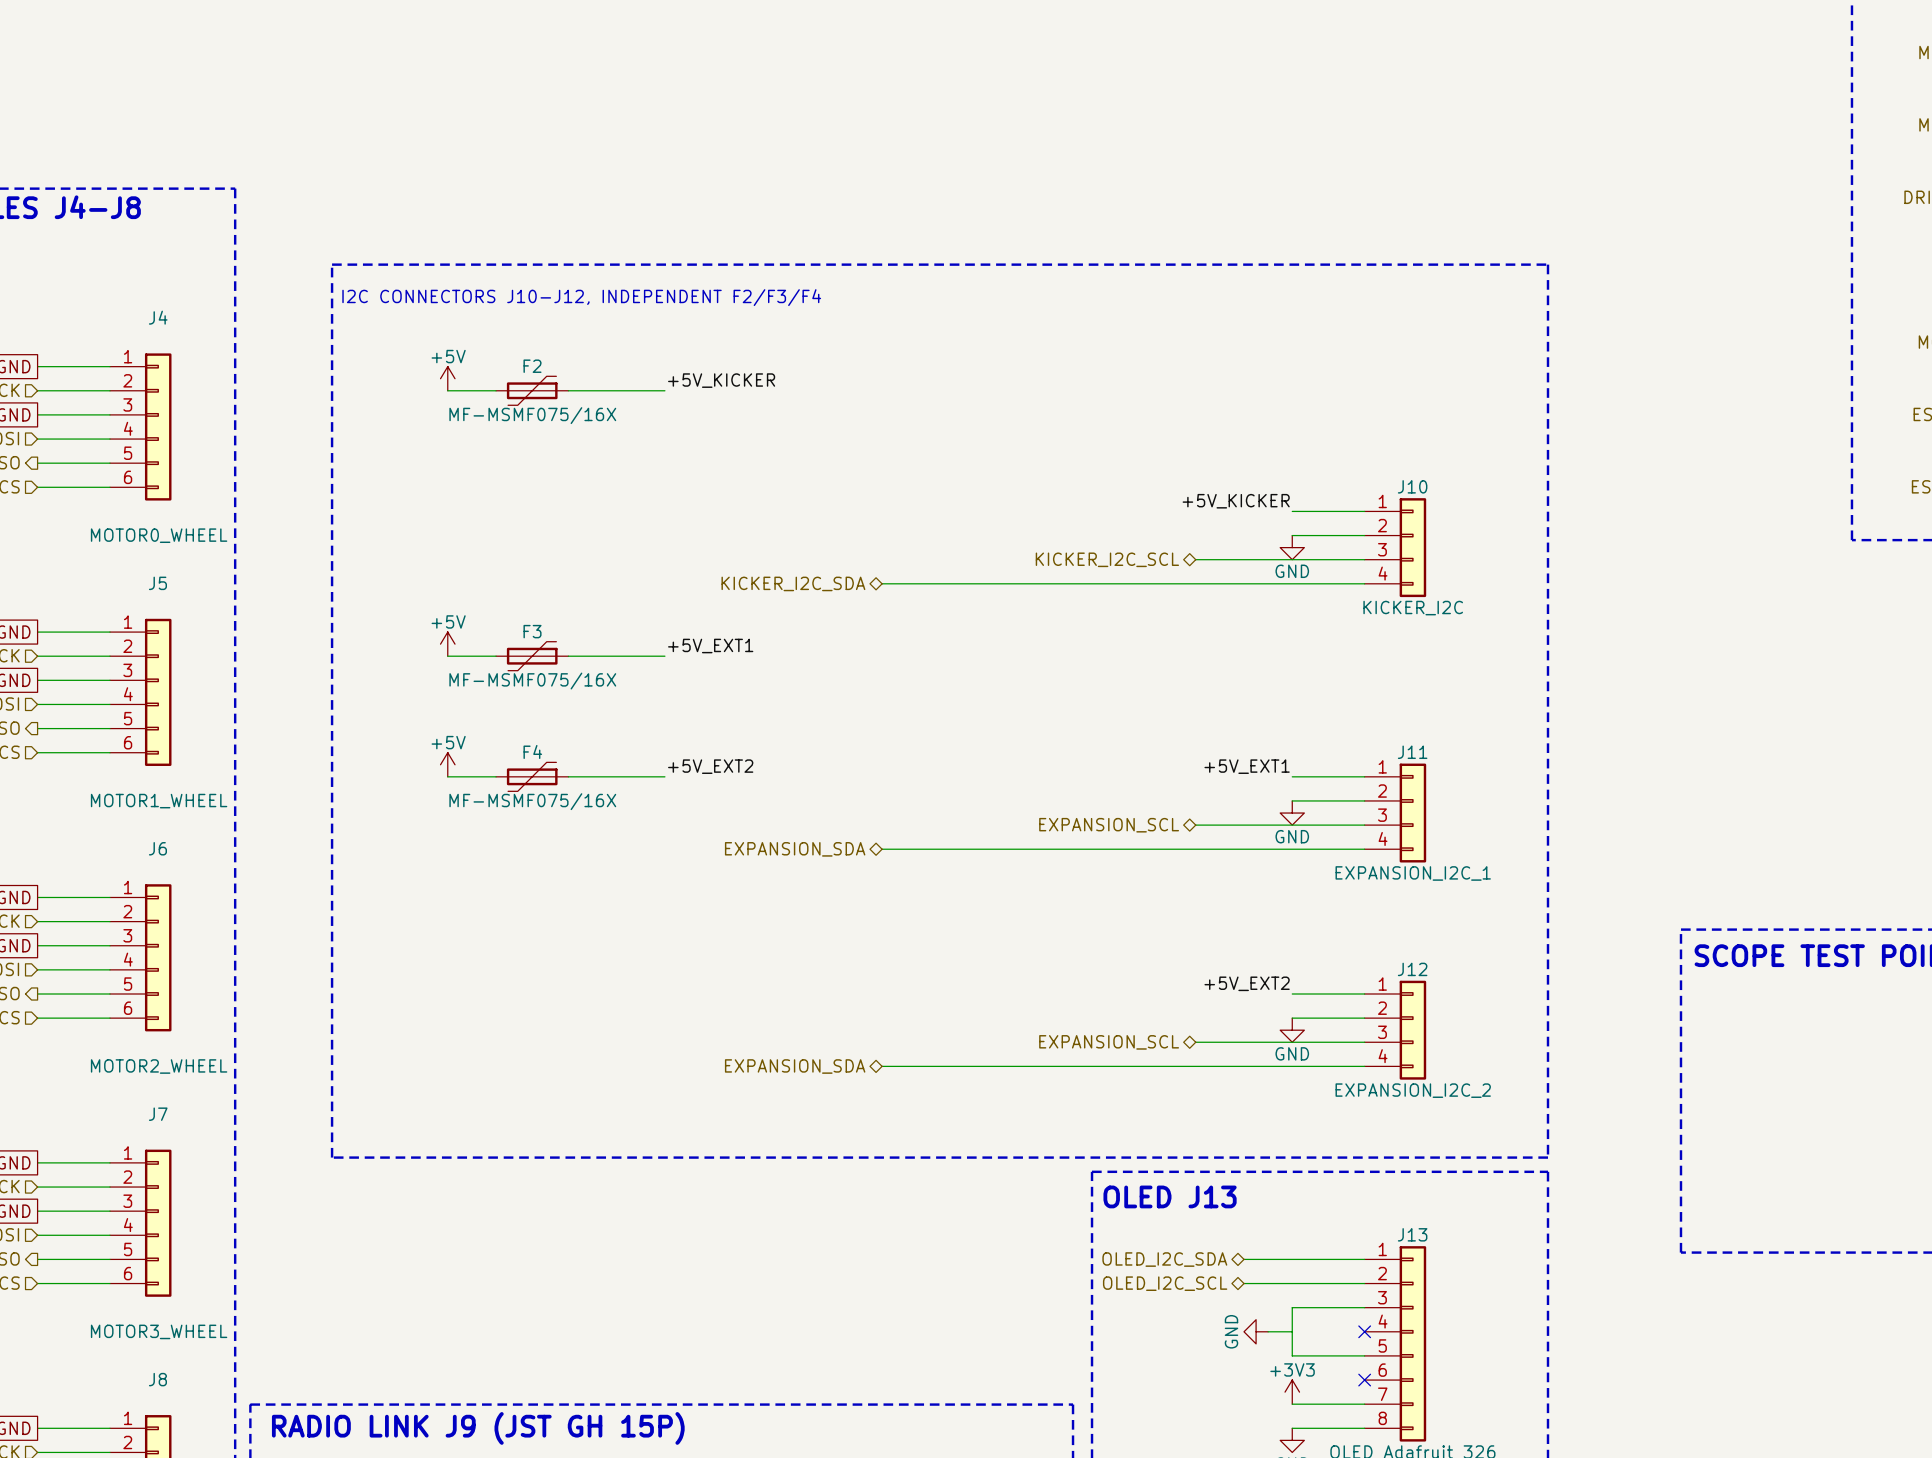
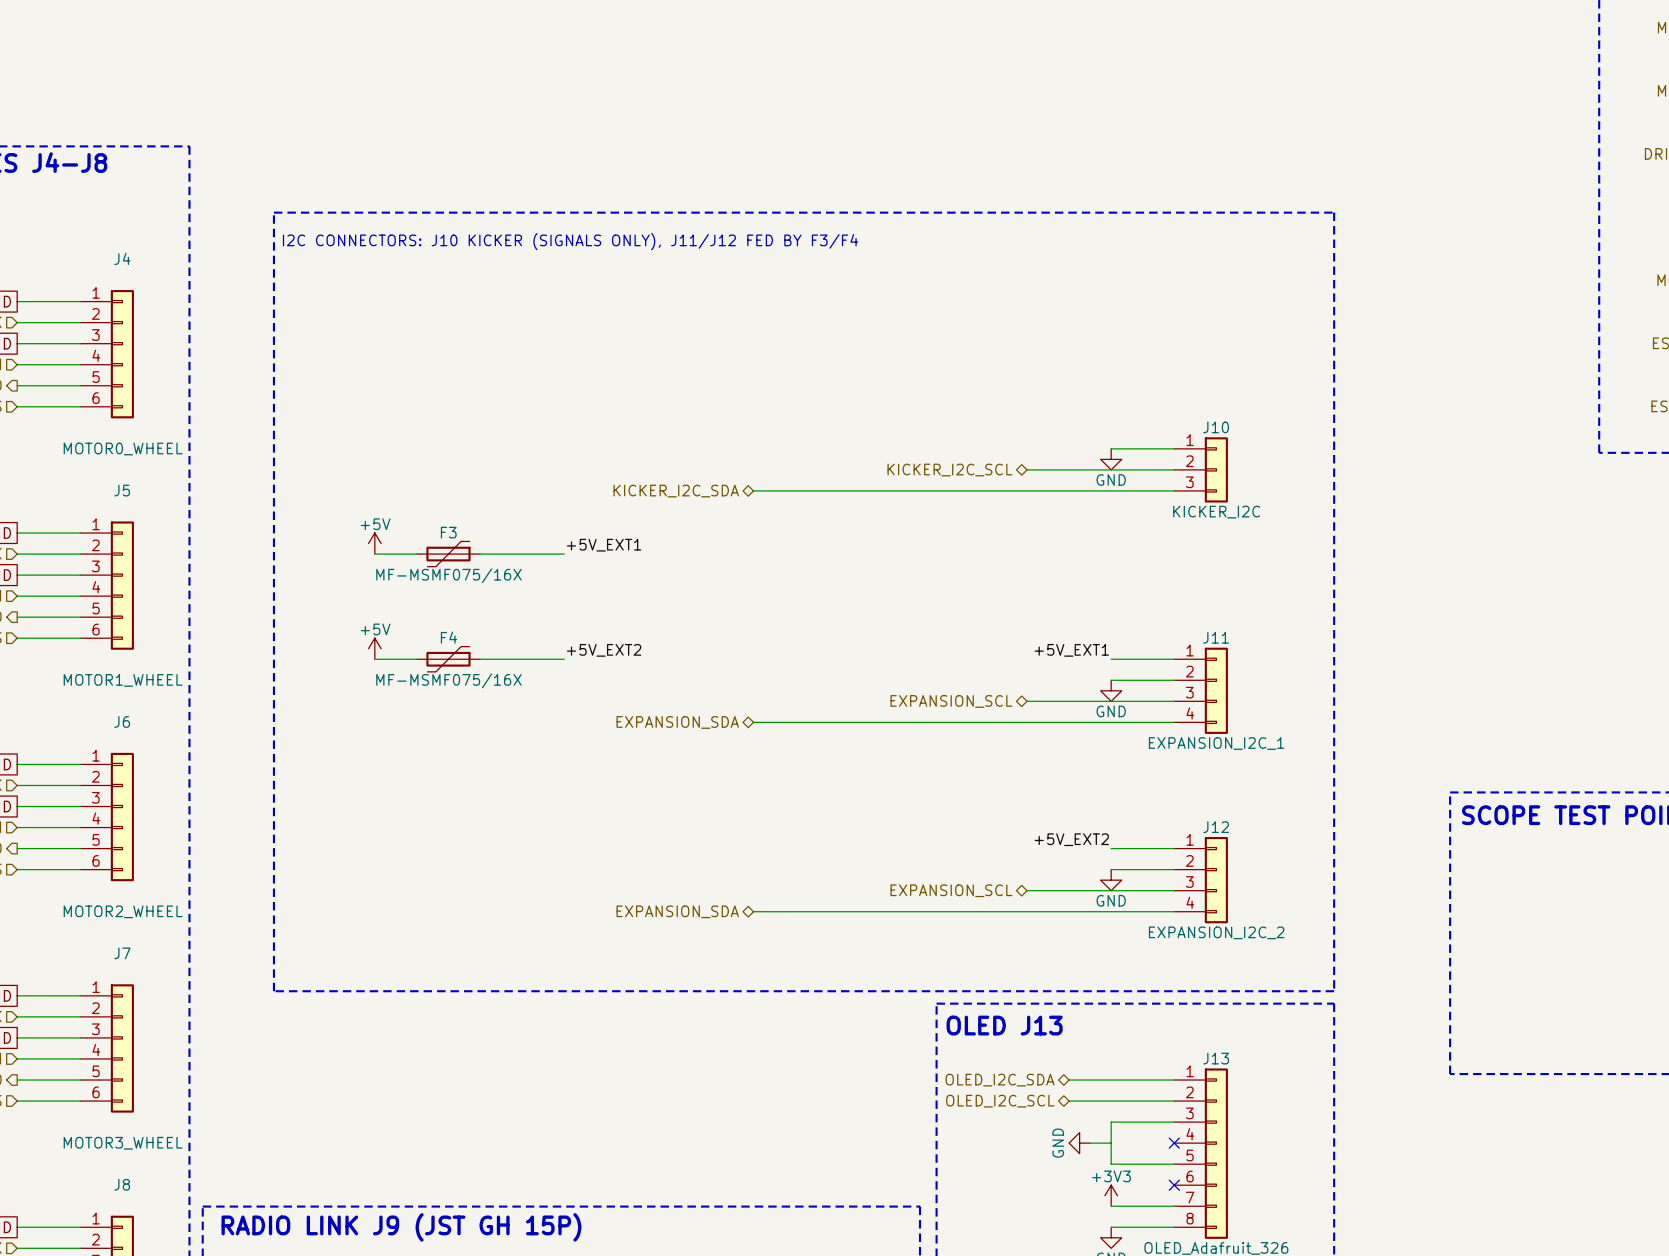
text: I2C CONNECTORS J10-J12, INDEPENDENT F2/F3/F4 (581, 297) -> I2C CONNECTORS: J10 KICKER (SIGNALS ONLY), J11/J12 FED BY F3/F4 (570, 241)
power symbol: +5V (447, 378) -> none
label: +5V_KICKER (721, 380) -> none
wire: (447, 390) (496, 390) -> none
F2: MF-MSMF075/16X (532, 390) -> none
wire: (568, 390) (664, 390) -> none
J10 symbol: [1364, 498, 1427, 598] -> [1174, 437, 1228, 503]
label: +5V_KICKER (1236, 501) -> none
wire: (1292, 511) (1364, 511) -> none

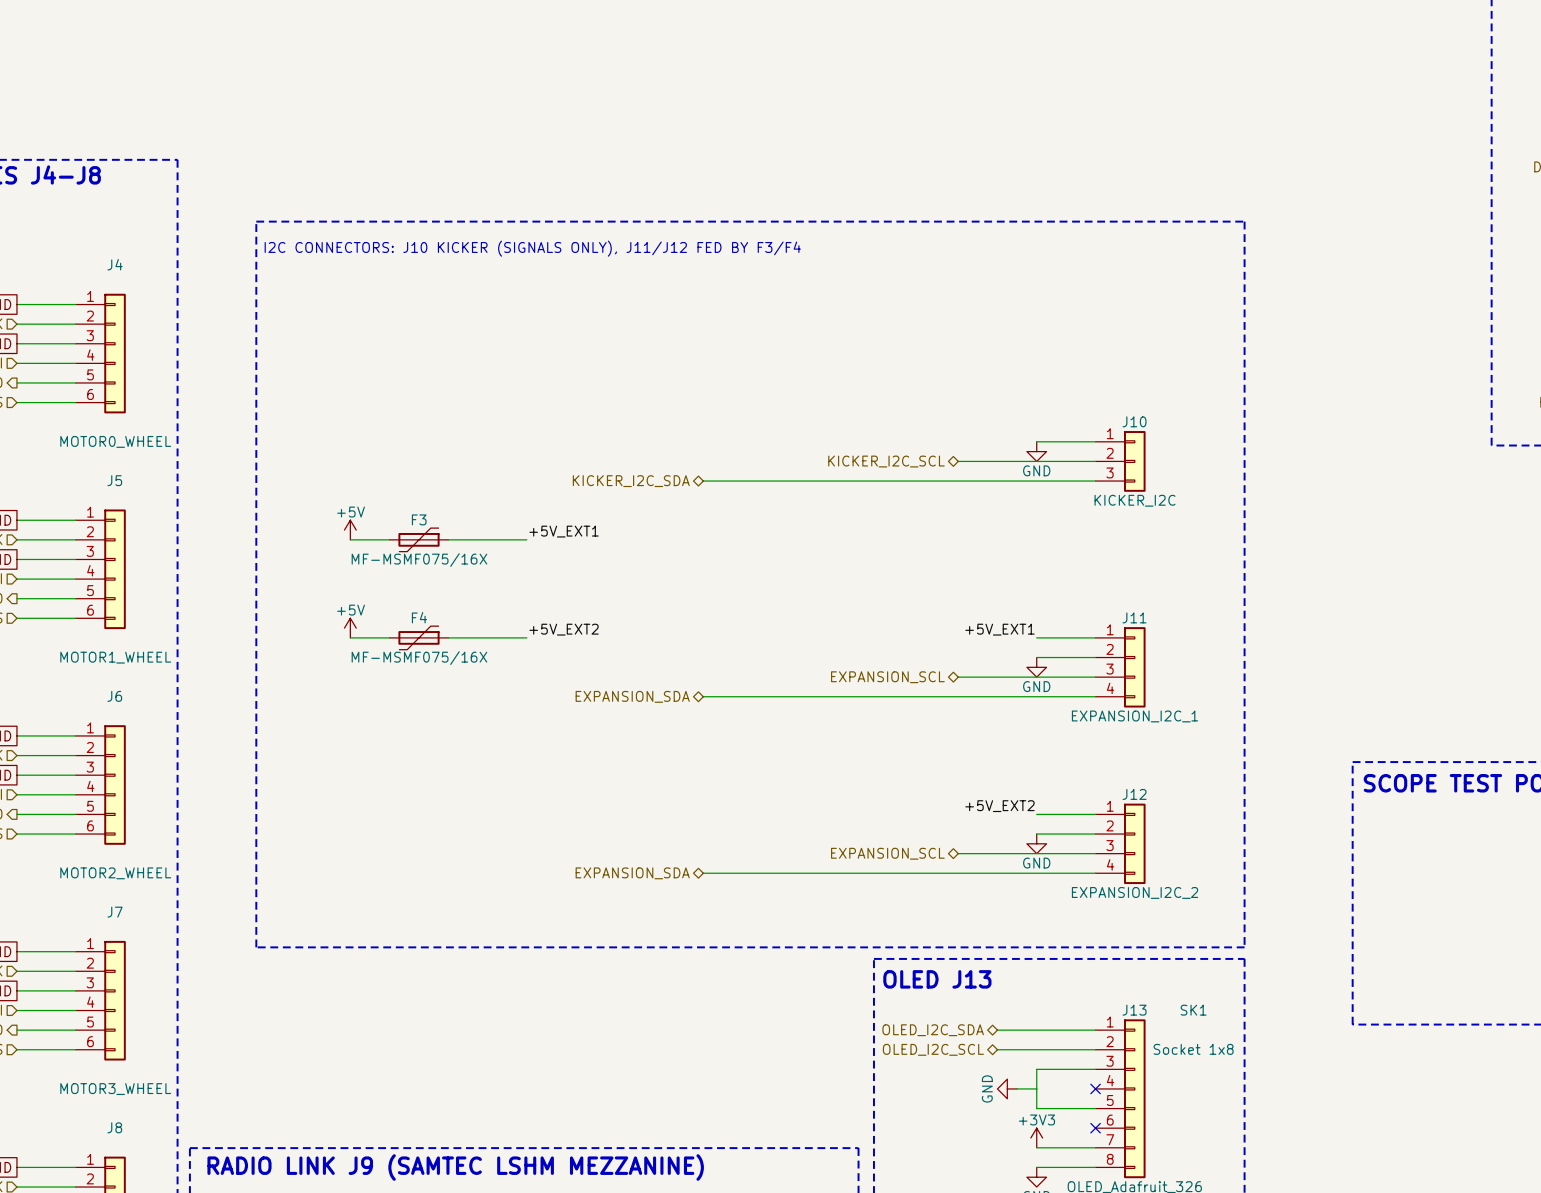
SK1: none -> Socket 1x8 (1193, 1029)
text: RADIO LINK J9 (JST GH 15P) (401, 1227) -> RADIO LINK J9 (SAMTEC LSHM MEZZANINE) (455, 1167)

